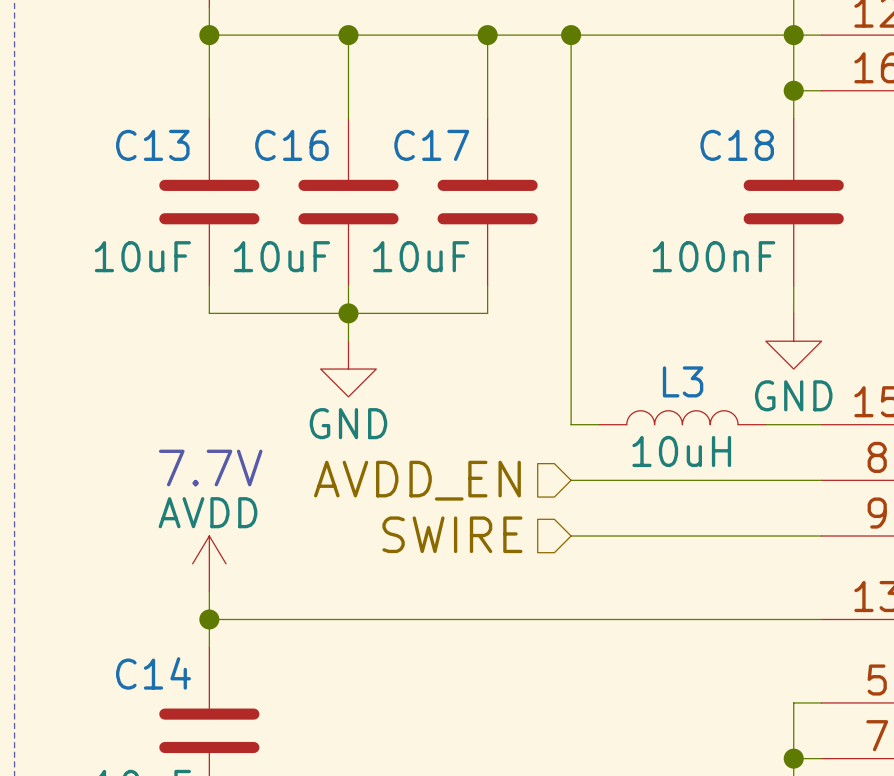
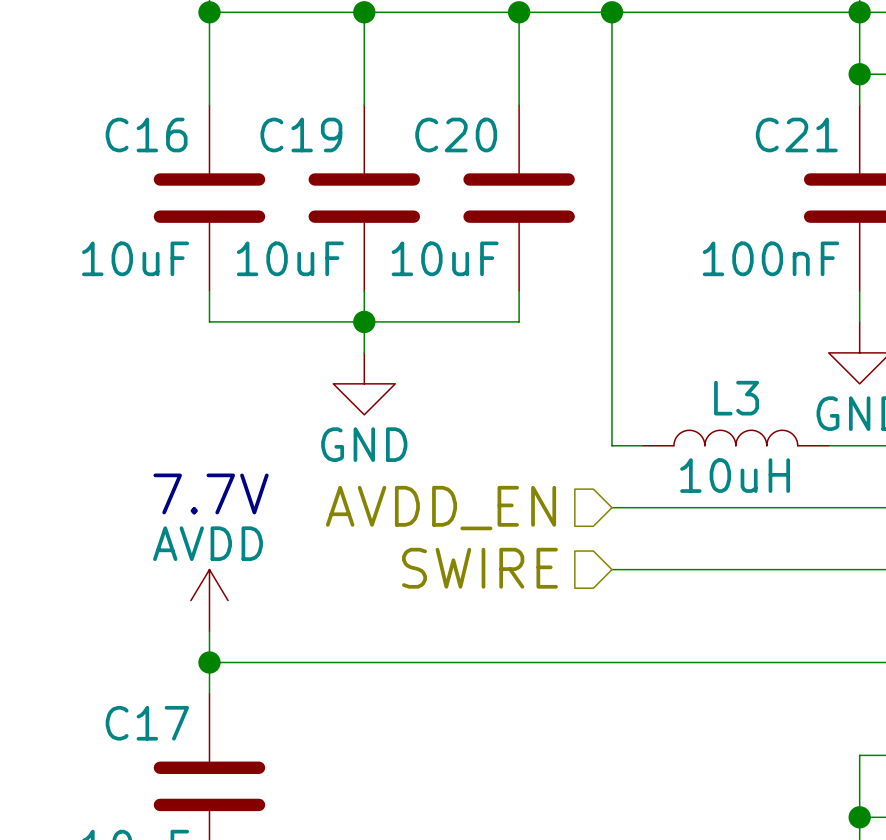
C13 name: C13 (152, 145) -> C16 (146, 135)
C16 name: C16 (291, 145) -> C19 (301, 135)
C17 name: C17 (431, 145) -> C20 (456, 135)
C18 name: C18 (737, 145) -> C21 (796, 135)
C14 name: C14 (153, 673) -> C17 (147, 723)

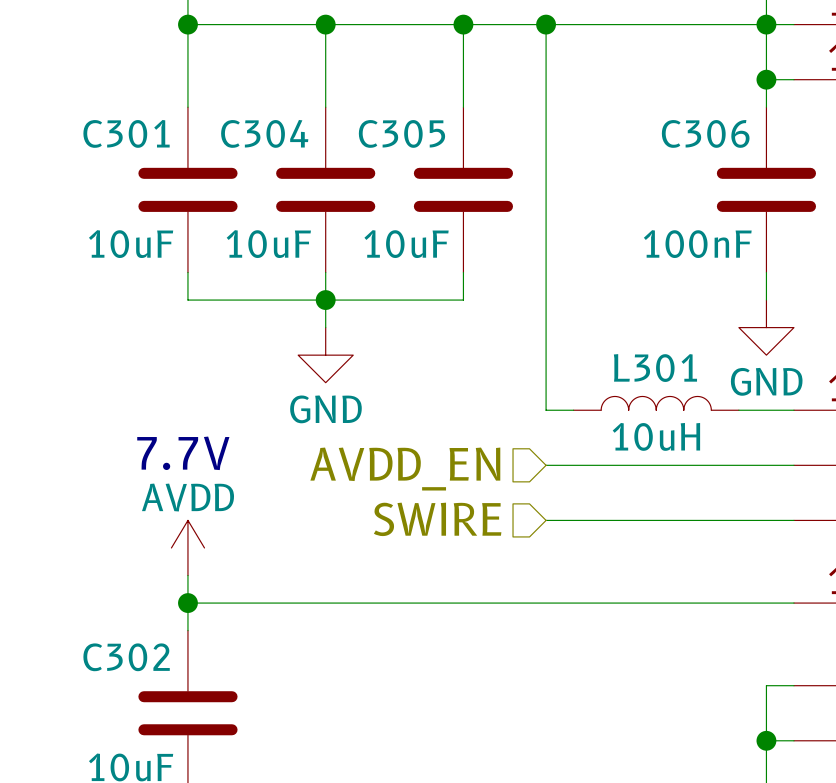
C16 name: C16 (146, 135) -> C301 (126, 133)
C19 name: C19 (301, 135) -> C304 (264, 133)
C20 name: C20 (456, 135) -> C305 (401, 133)
C21 name: C21 (796, 135) -> C306 (705, 133)
L3 name: L3 (736, 398) -> L301 (655, 368)
C17 name: C17 (147, 723) -> C302 (126, 657)

